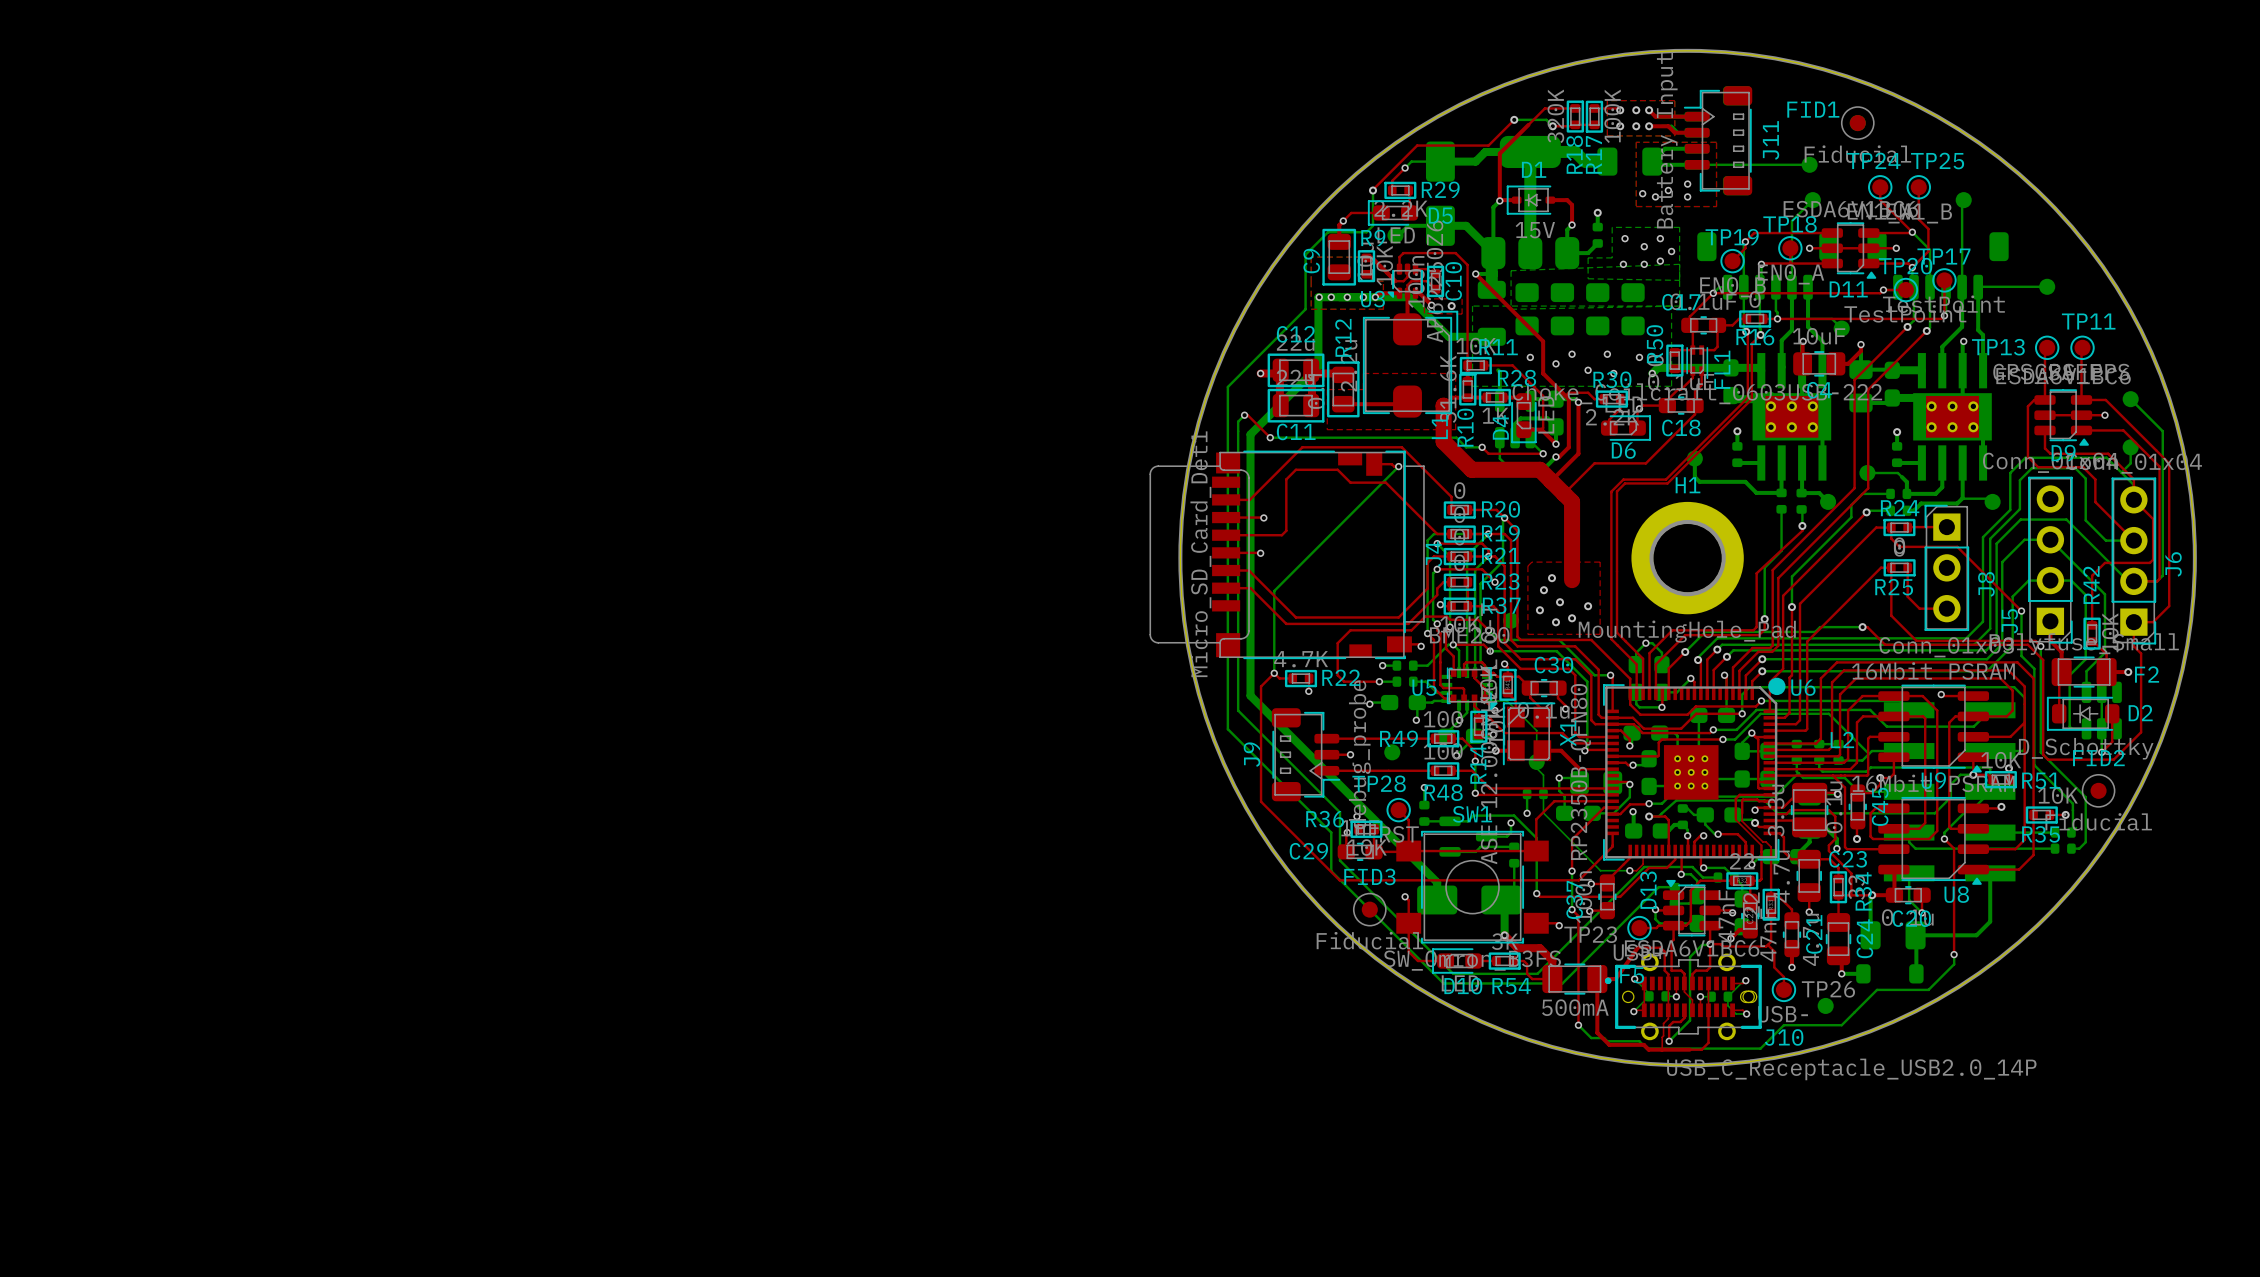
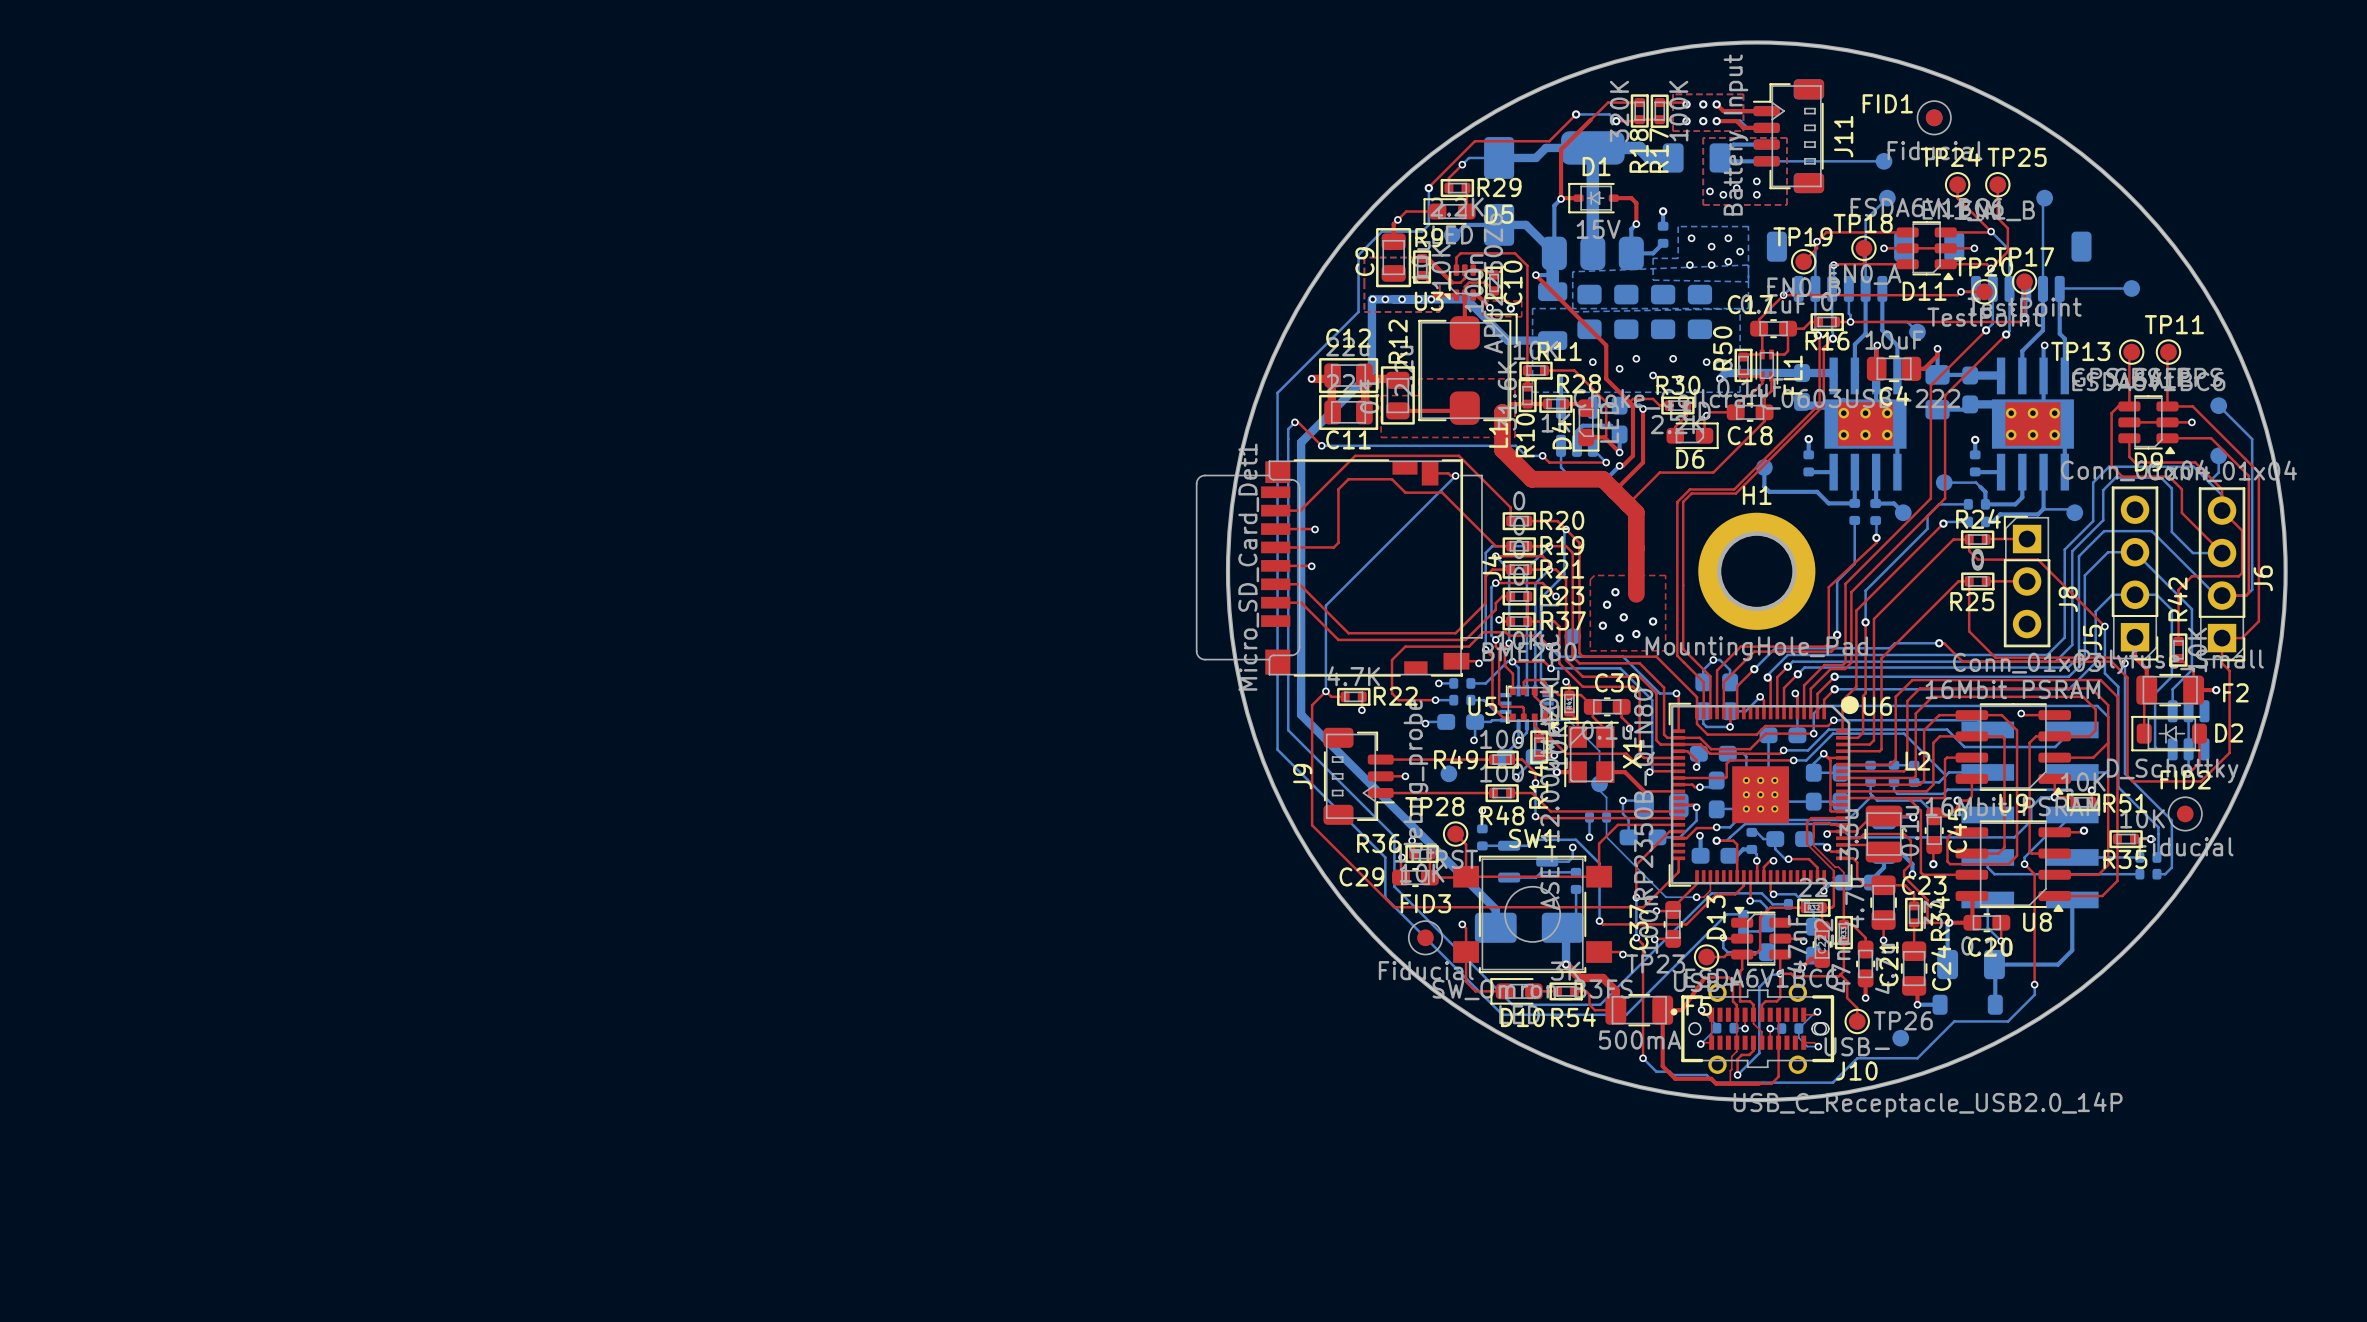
top track: (1907, 567) (1907, 596) (1919, 608) (1946, 608) -> (1986, 581) (2026, 581)

